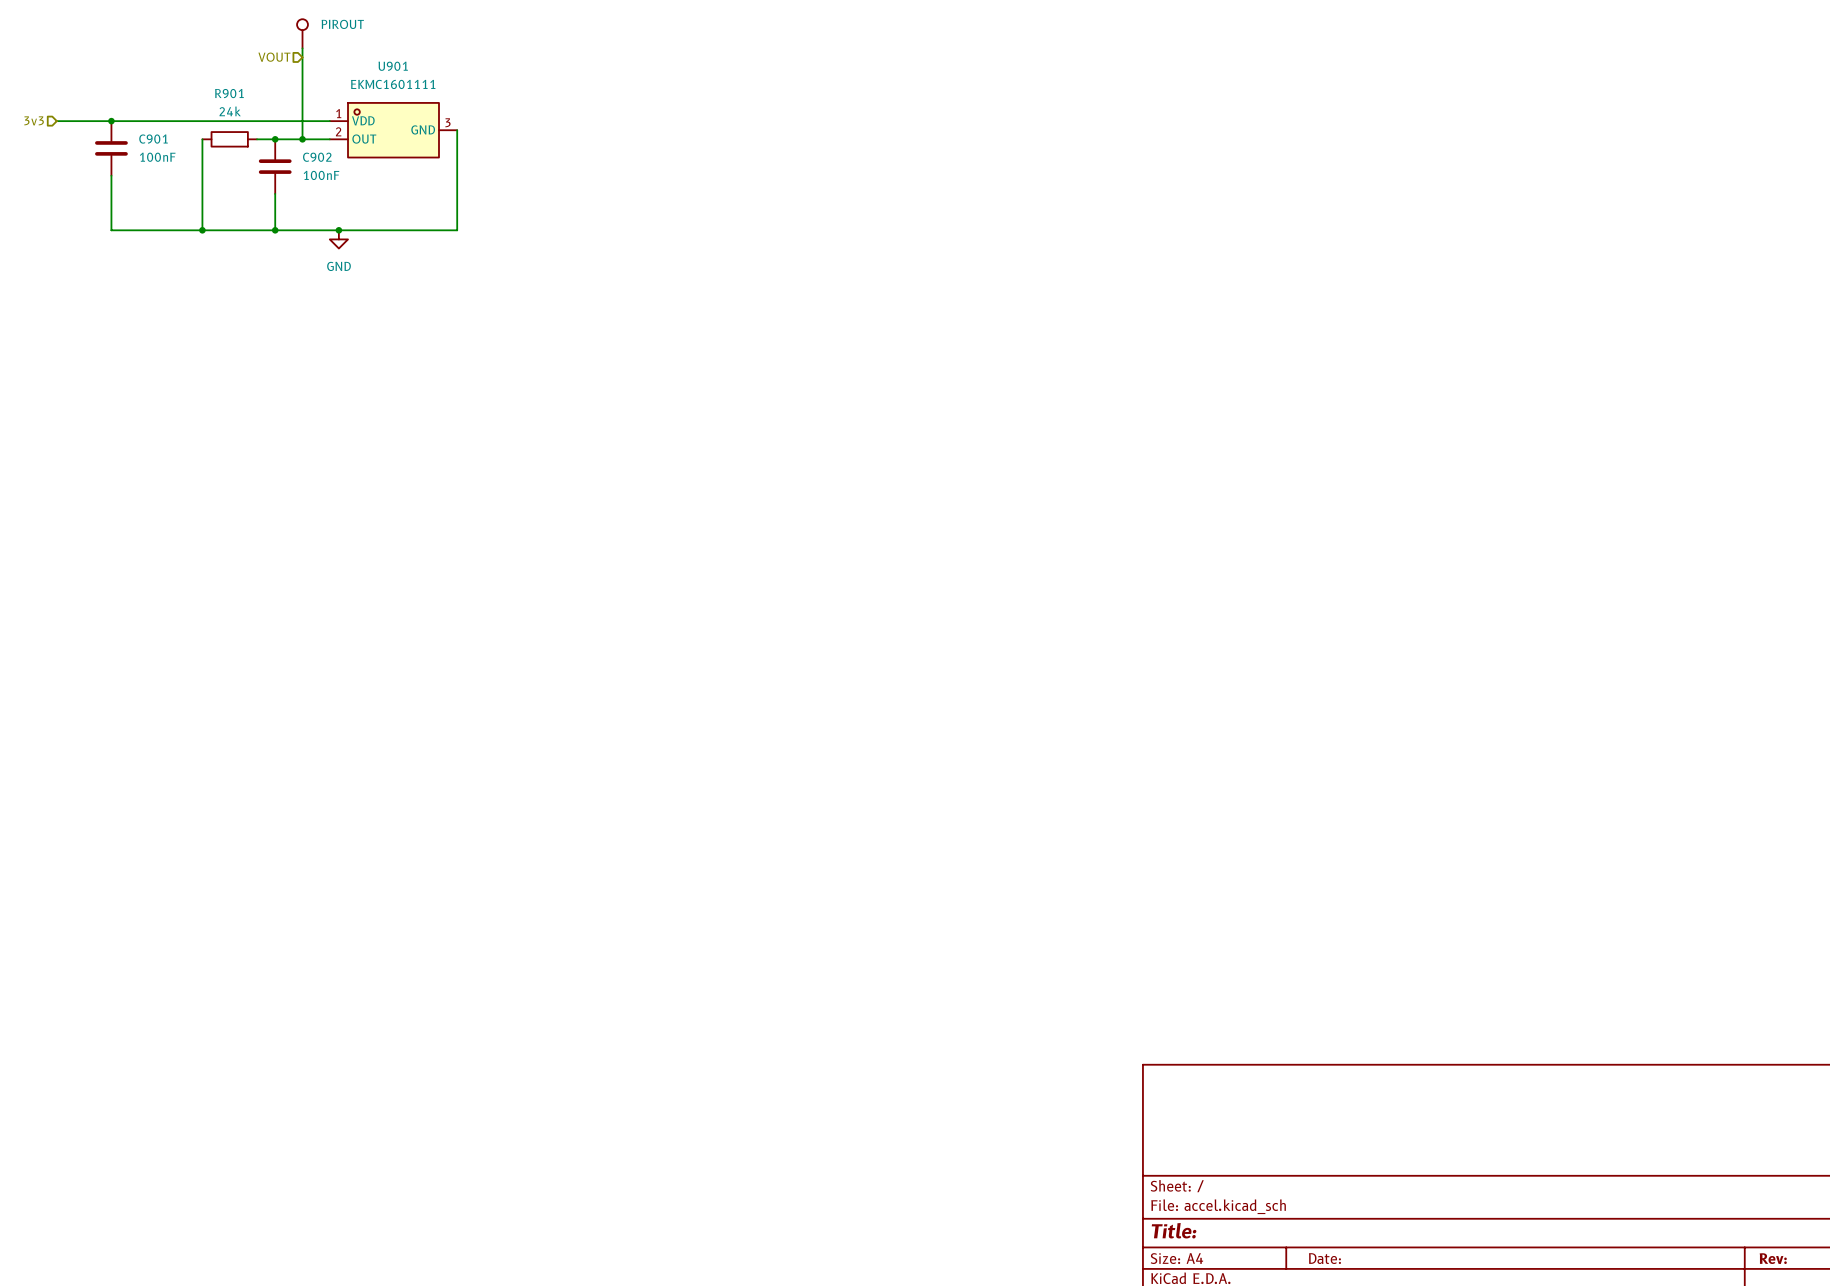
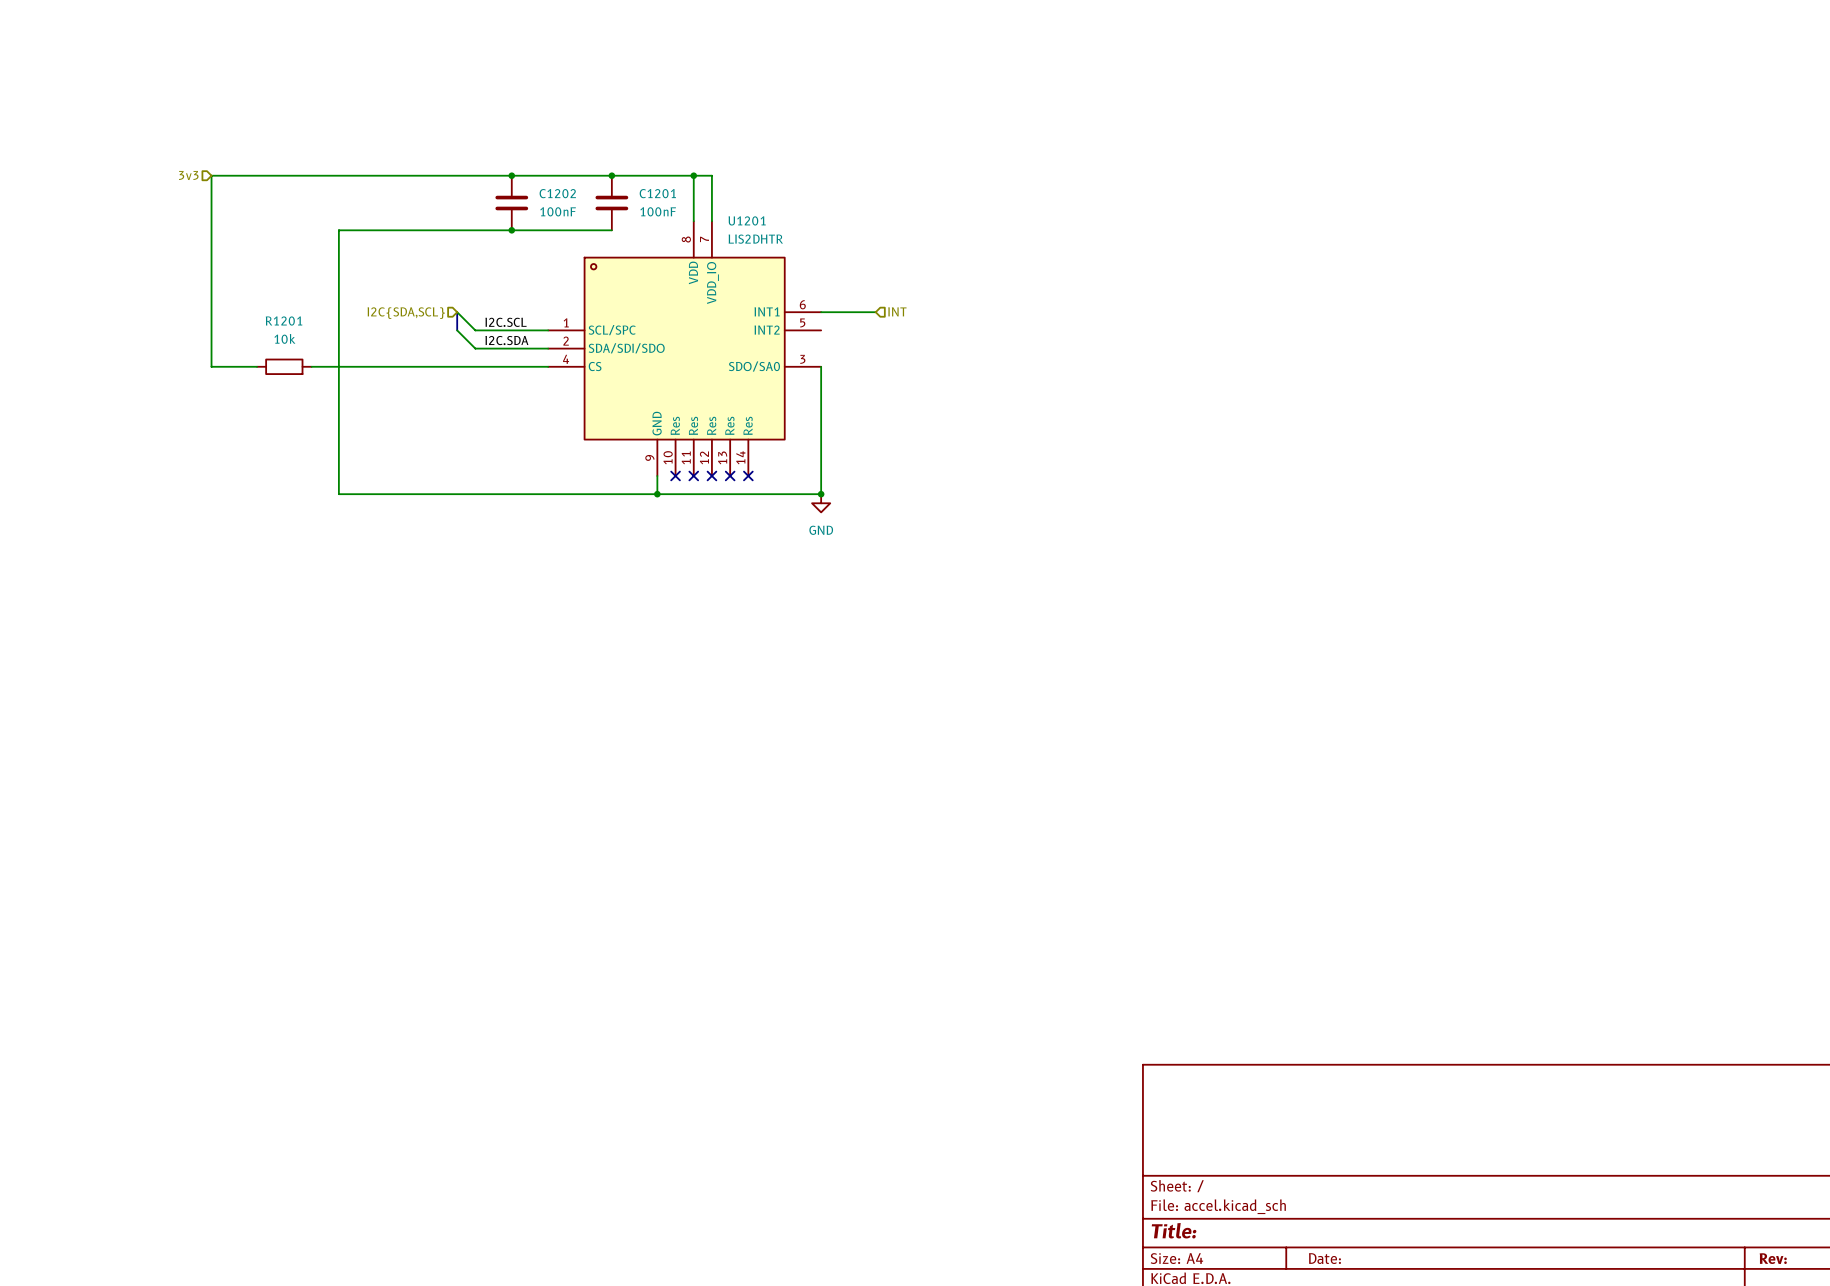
part: (302, 33) -> none
wire: (302, 48) (302, 139) -> none
hierarchical label: VOUT (274, 57) -> none
hierarchical label position: 3v3 (34, 120) -> 3v3 (188, 175)
wire: (56, 121) (329, 121) -> none
junction: (111, 121) -> none
U901: EKMC1601111 (393, 130) -> none
wire: (457, 130) (457, 230) -> (611, 230) (457, 230)
wire: (202, 139) (202, 230) -> none
R901: 24k (229, 139) -> none
wire: (257, 139) (329, 139) -> none
junction: (275, 139) -> none
junction: (302, 139) -> none
C901: 100nF (111, 148) -> none
C902: 100nF (275, 166) -> none
wire: (111, 175) (111, 230) (338, 230) -> (821, 366) (821, 494) (338, 494) (338, 230)
junction: none -> (511, 175)
junction: none -> (611, 175)
wire: none -> (693, 175) (693, 221)
junction: none -> (693, 175)
wire: (275, 193) (275, 230) -> none
C1202: none -> 100nF (511, 203)
C1201: none -> 100nF (611, 203)
wire: none -> (711, 221) (711, 175) (211, 175) (211, 366) (257, 366)
junction: (202, 230) -> none
junction: (275, 230) -> none
junction: (338, 230) -> none
junction: none -> (511, 230)
power symbol: GND (338, 239) -> none
hierarchical label: none -> INT (897, 311)
wire: none -> (457, 312) (475, 330) (548, 330)
bus: none -> (457, 312) (457, 330)
wire: none -> (821, 312) (875, 312)
hierarchical label: none -> I2C{SDA,SCL} (406, 313)
label: none -> I2C.SCL (506, 322)
wire: none -> (457, 330) (475, 348) (548, 348)
label: none -> I2C.SDA (506, 340)
U1201: none -> LIS2DHTR (684, 348)
R1201: none -> 10k (284, 366)
wire: none -> (311, 366) (548, 366)
wire: none -> (657, 475) (657, 494)
no-connect mark: none -> (675, 475)
no-connect mark: none -> (693, 475)
no-connect mark: none -> (711, 475)
no-connect mark: none -> (730, 475)
no-connect mark: none -> (748, 475)
junction: none -> (657, 494)
junction: none -> (821, 494)
power symbol: none -> GND (821, 503)

